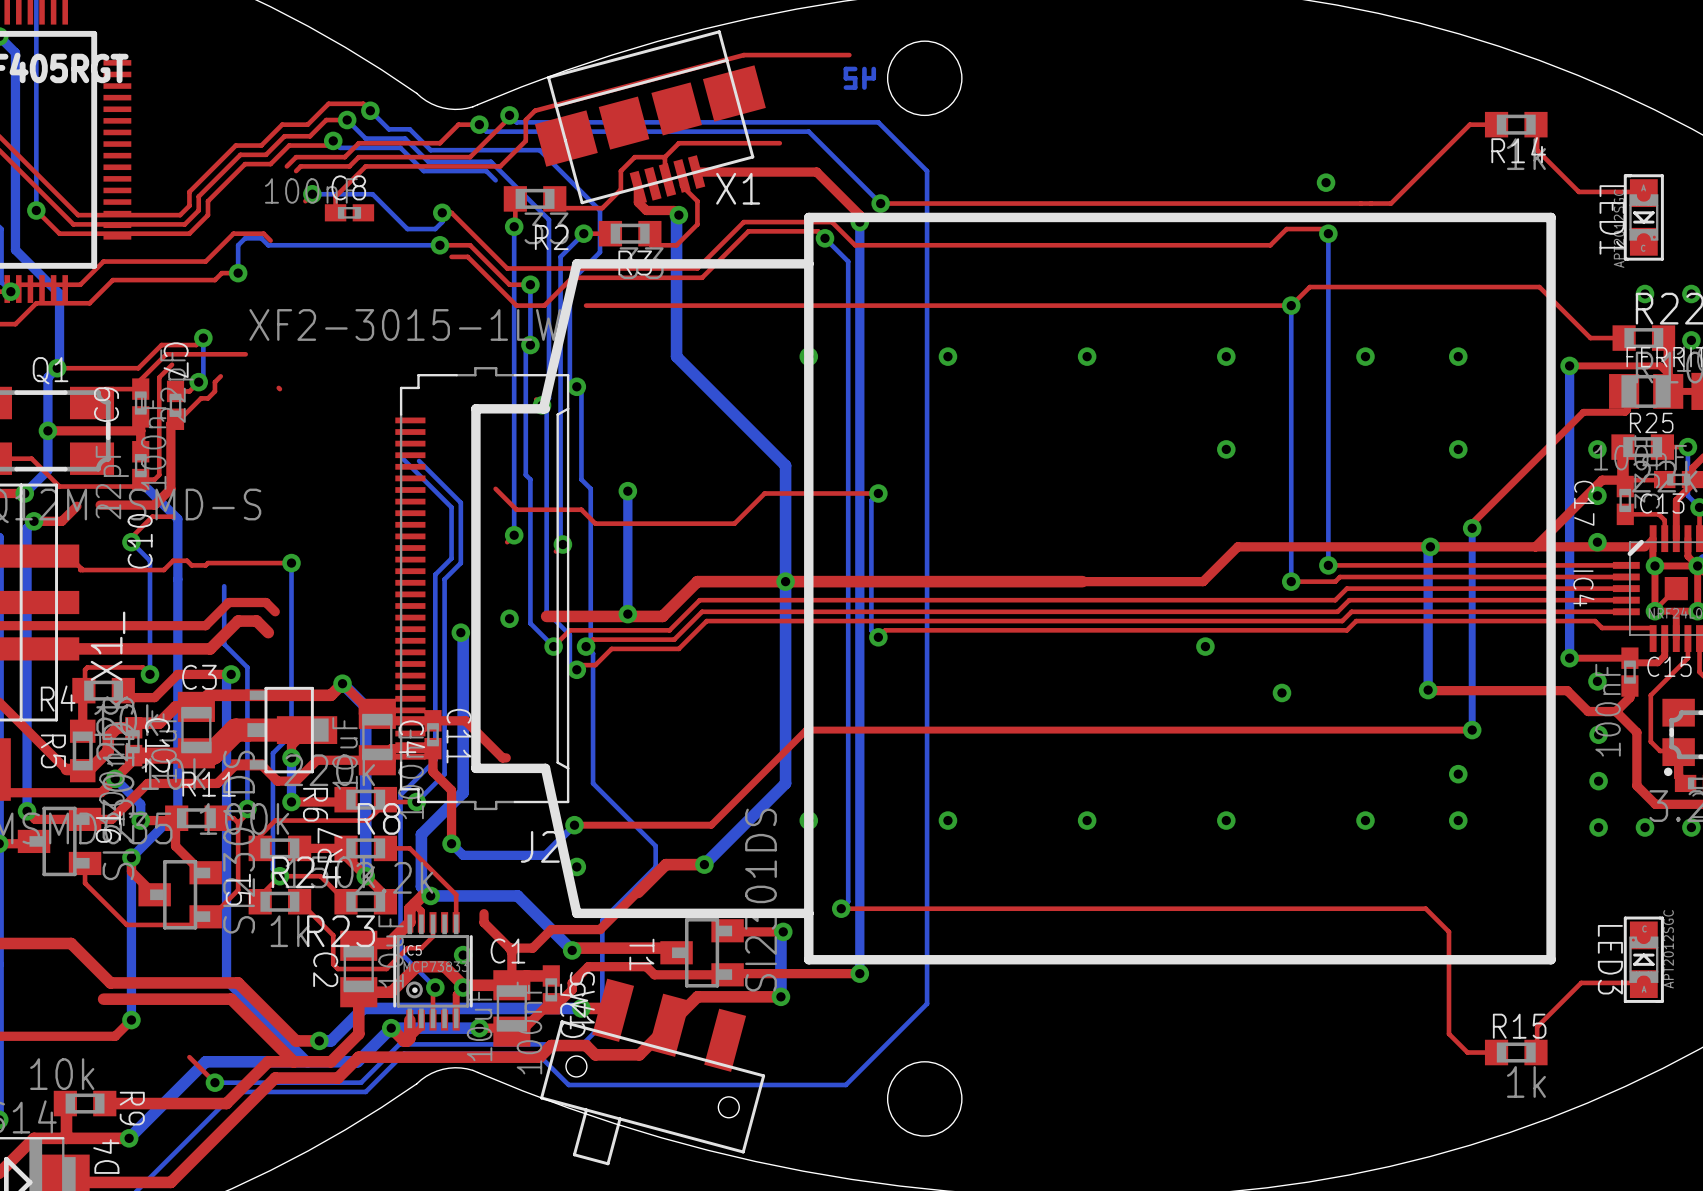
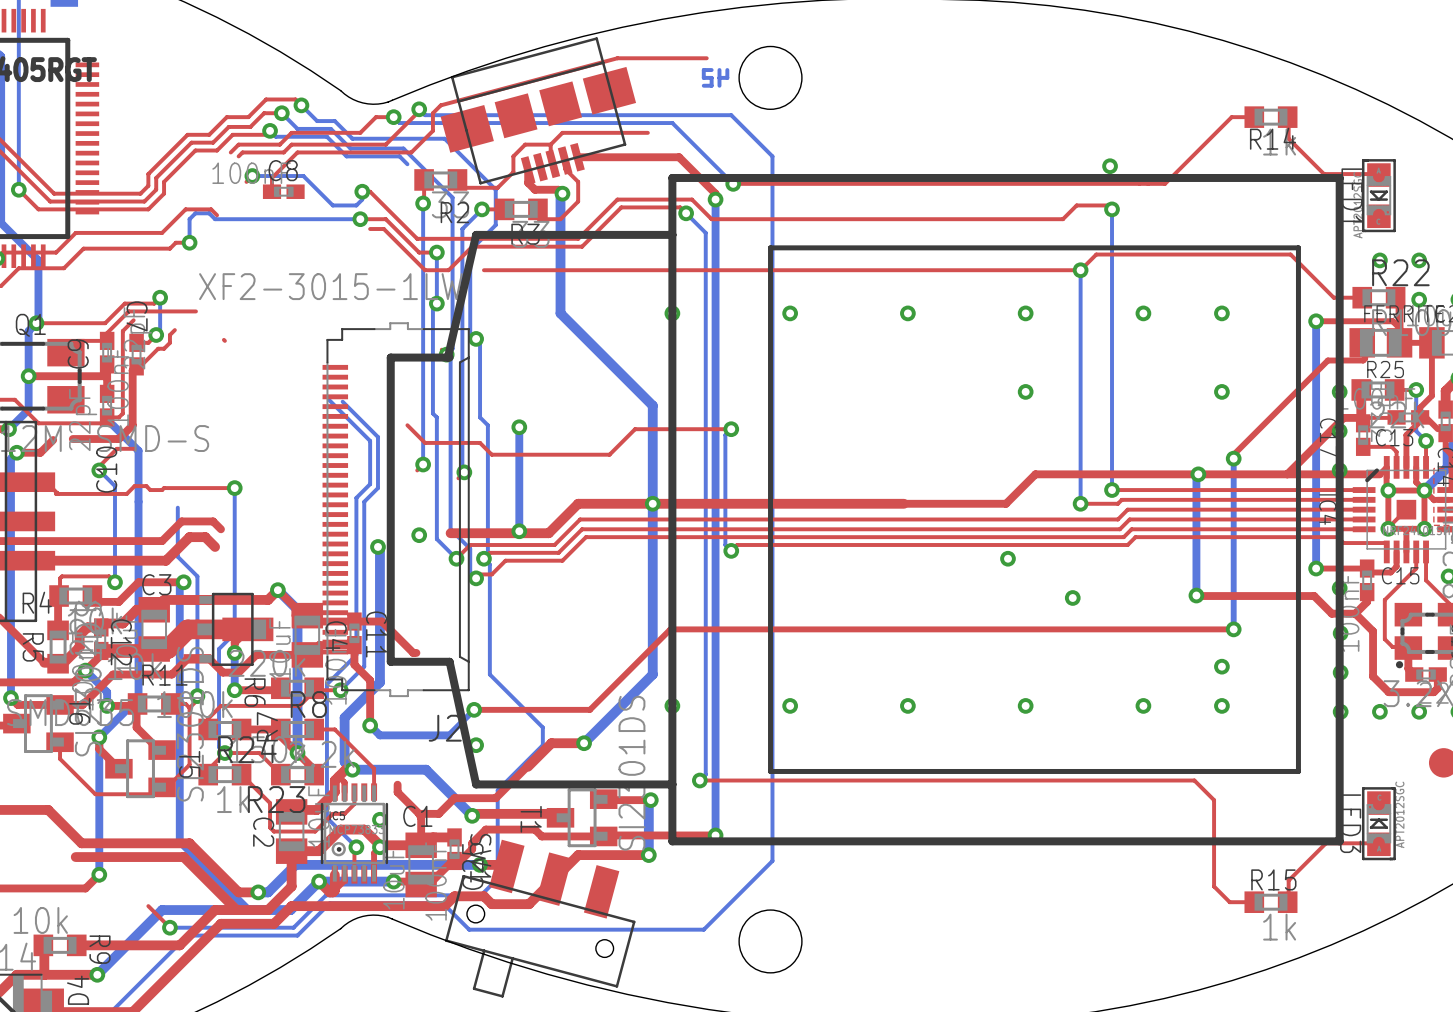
X1 name: X1 (738, 188) -> none
line: (808, 217) (1551, 217) (1551, 959) (808, 959) -> (672, 195) (672, 177) (1339, 177) (1339, 841) (672, 841) (672, 823)
line: none -> (770, 247) (1298, 247) (1298, 771) (770, 771) (770, 247)
X1_ name: X1_ (108, 646) -> none

